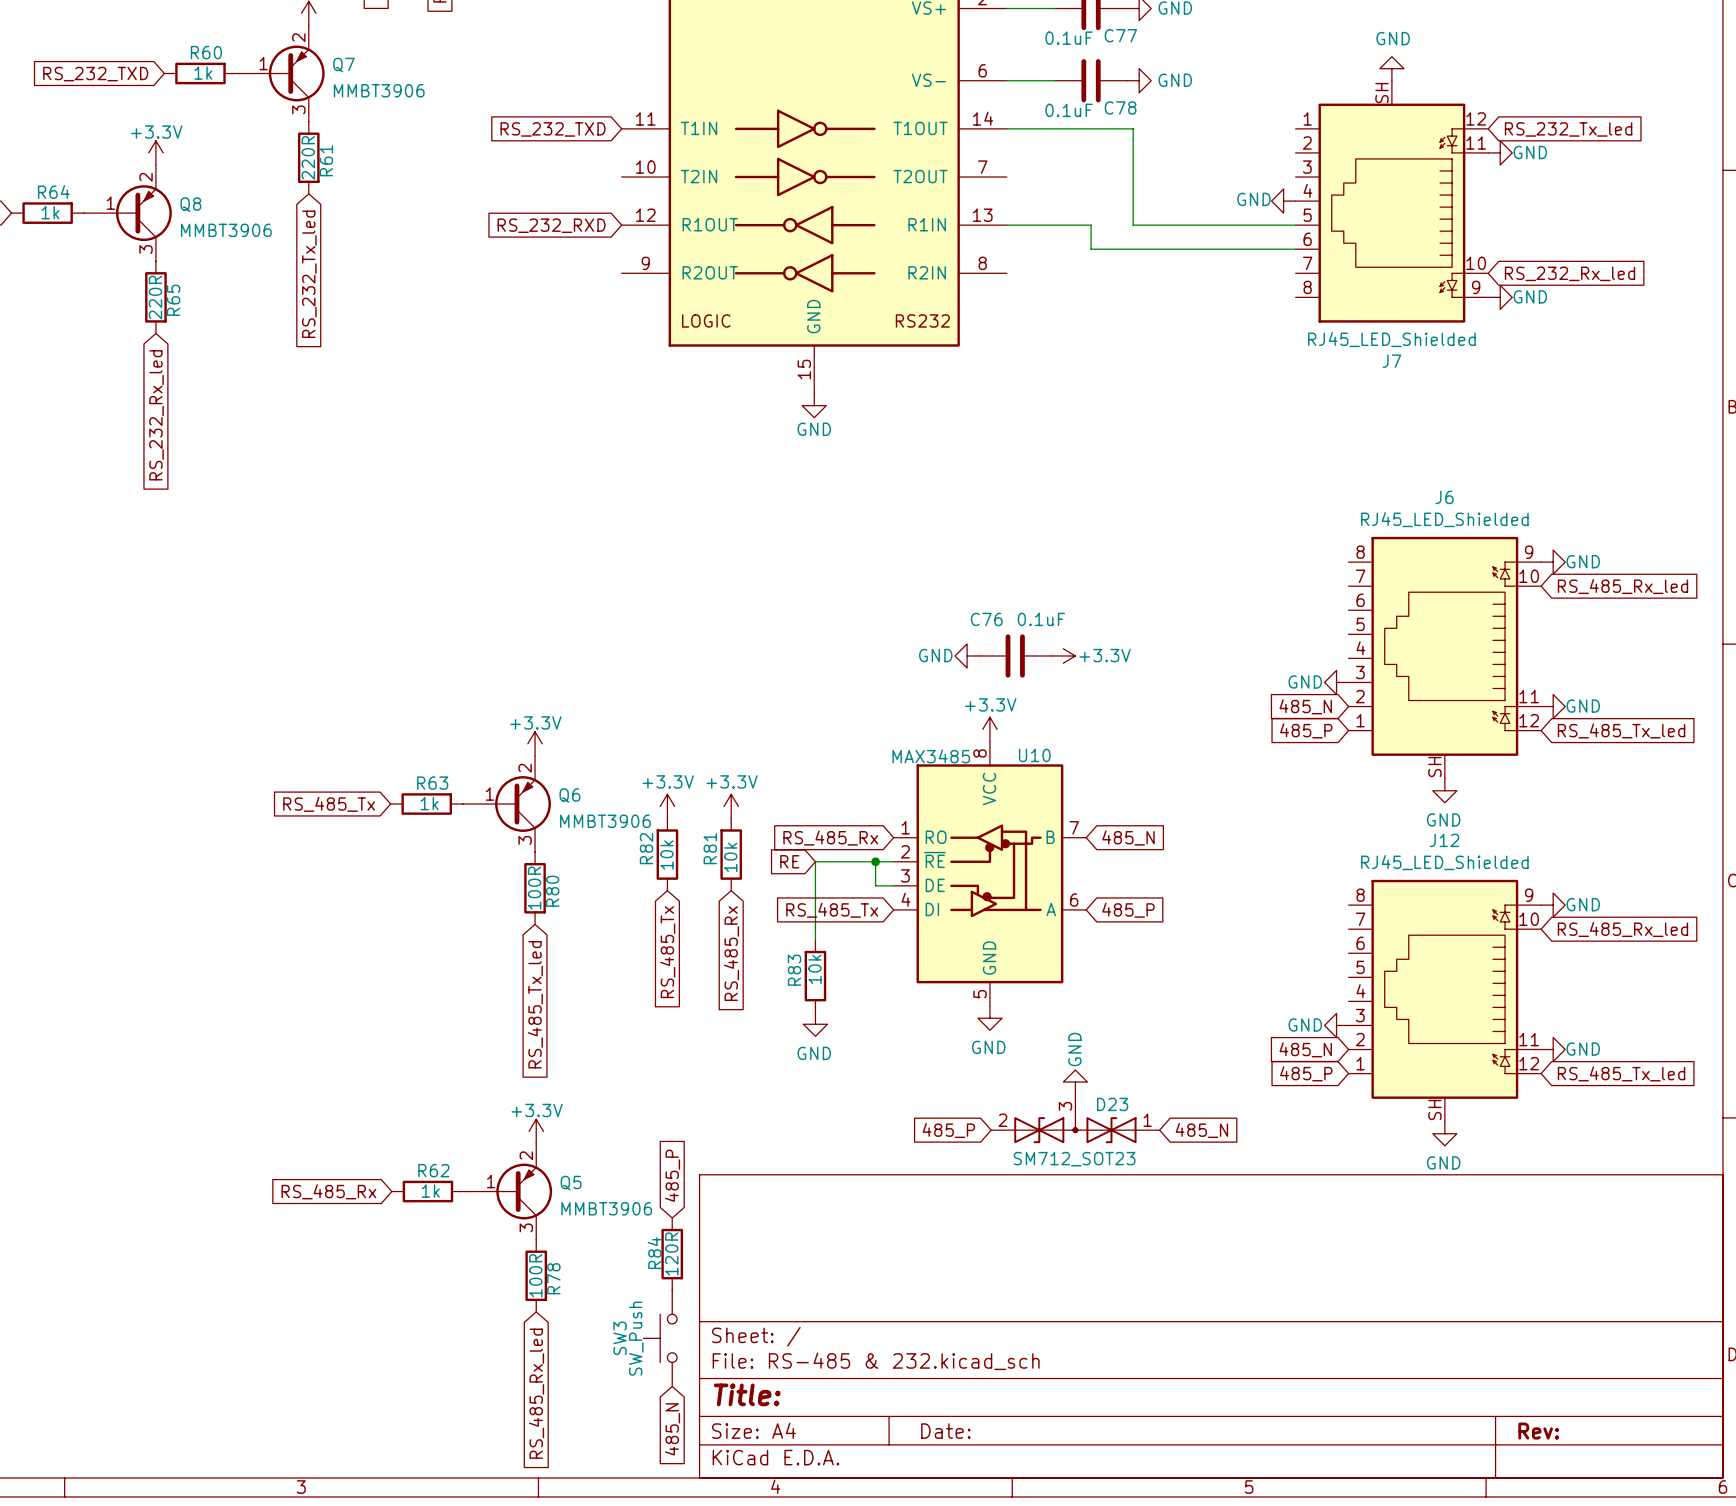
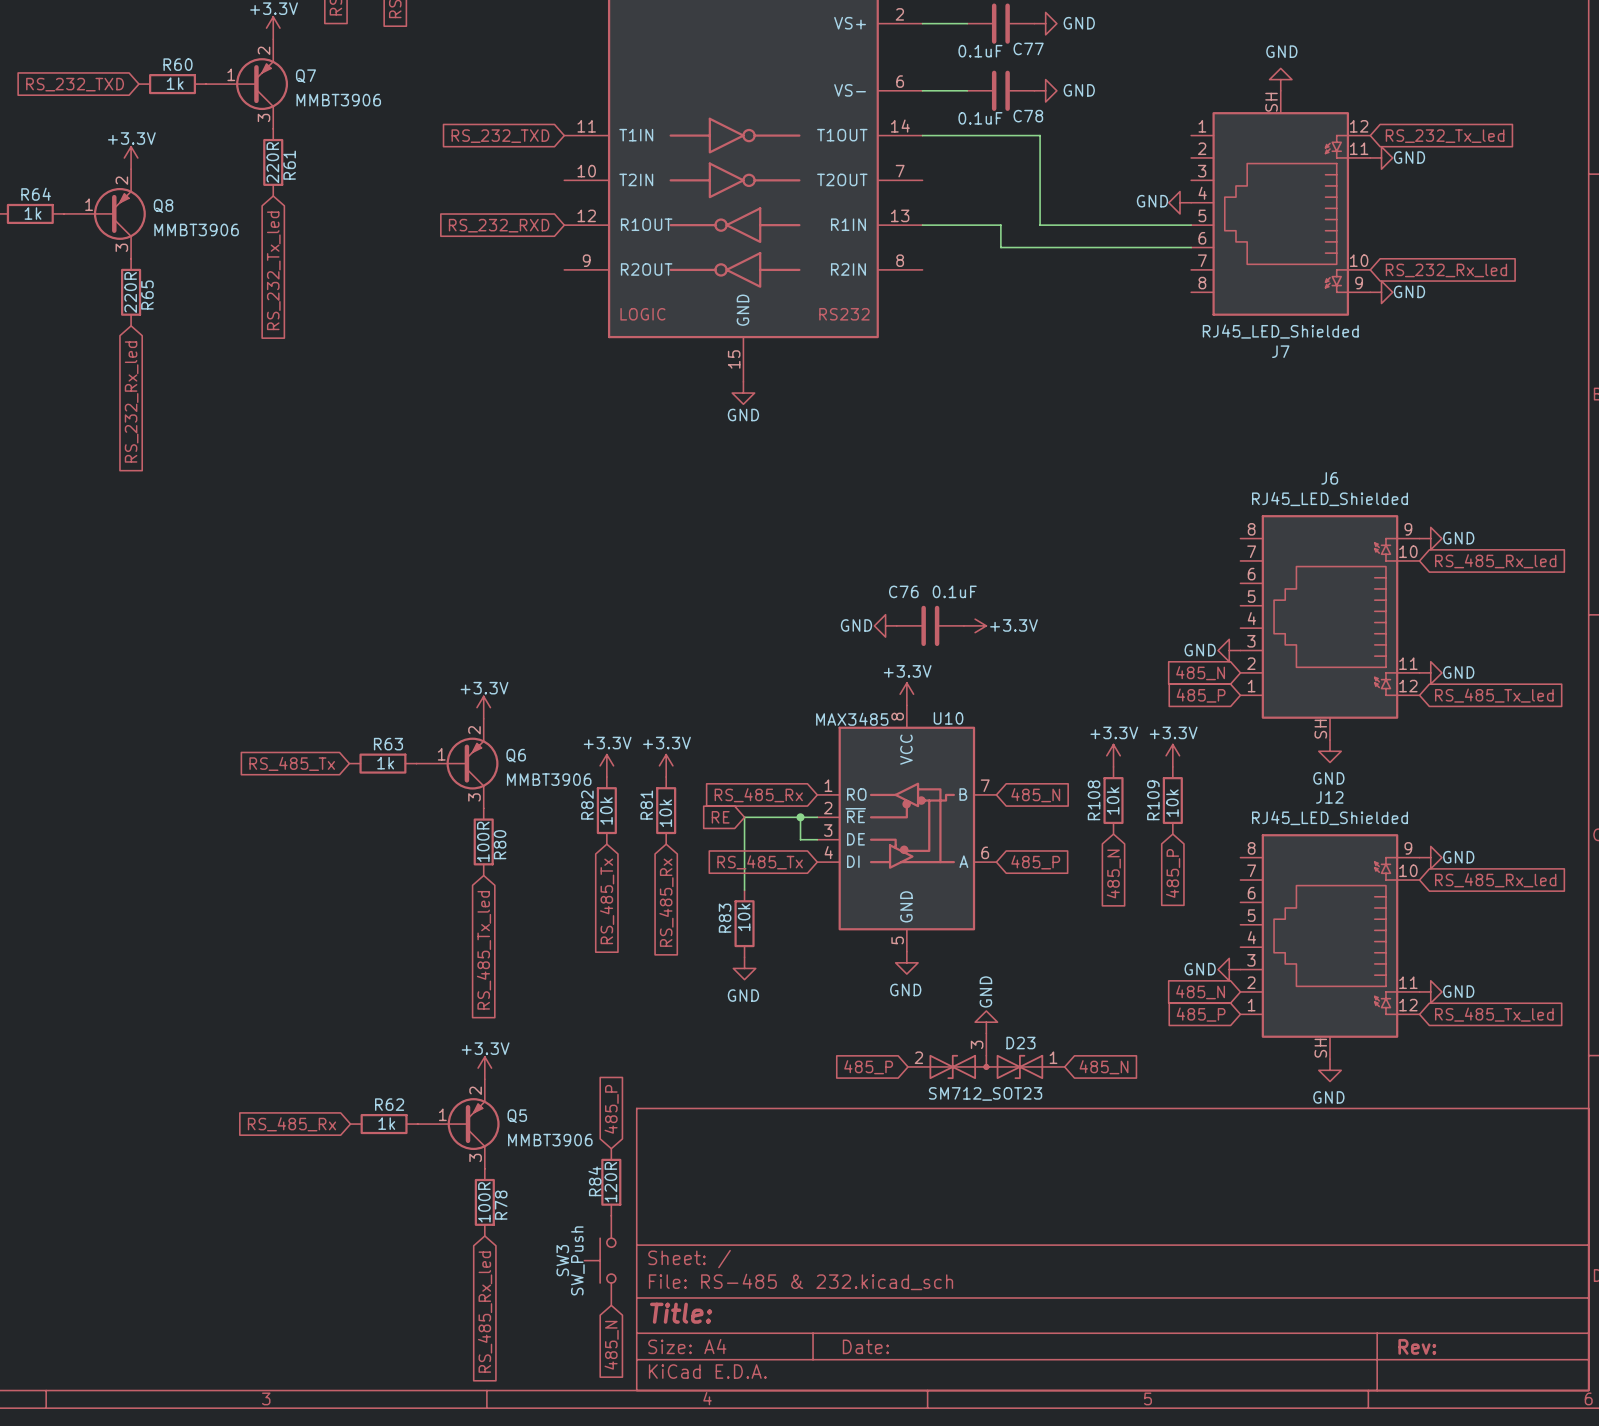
power symbol: none -> +3.3V (1113, 755)
power symbol: none -> +3.3V (1172, 755)
R108: none -> 10k (1113, 800)
R109: none -> 10k (1172, 800)
global label: none -> 485_N (1113, 873)
global label: none -> 485_P (1173, 873)

